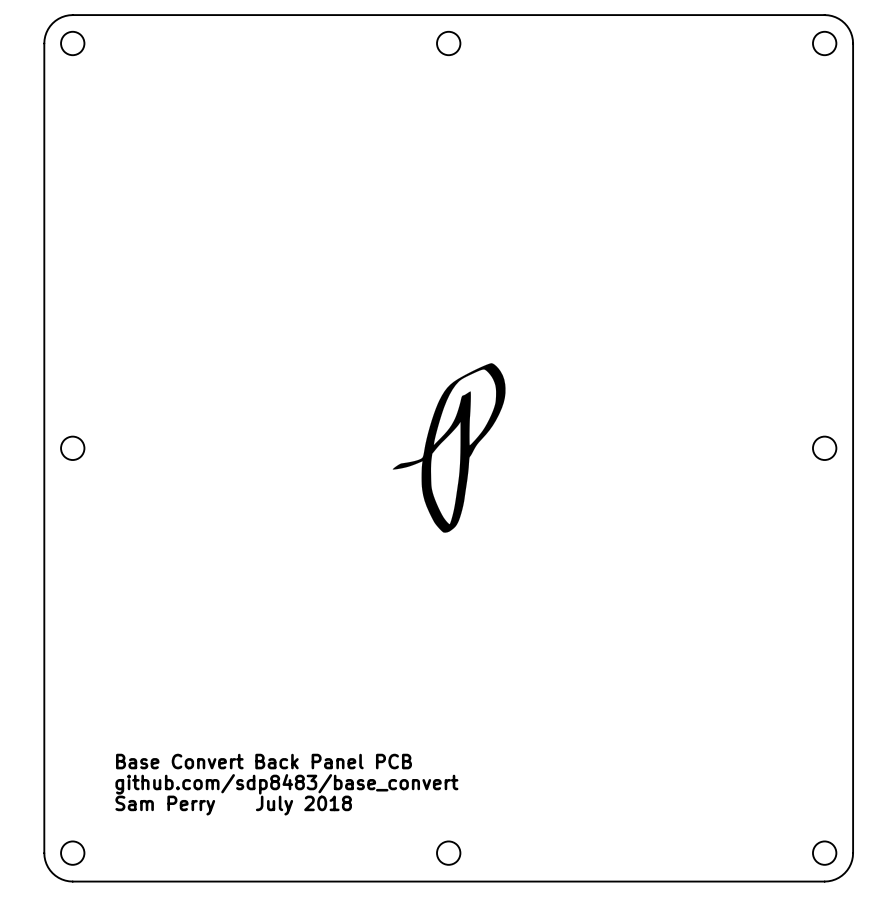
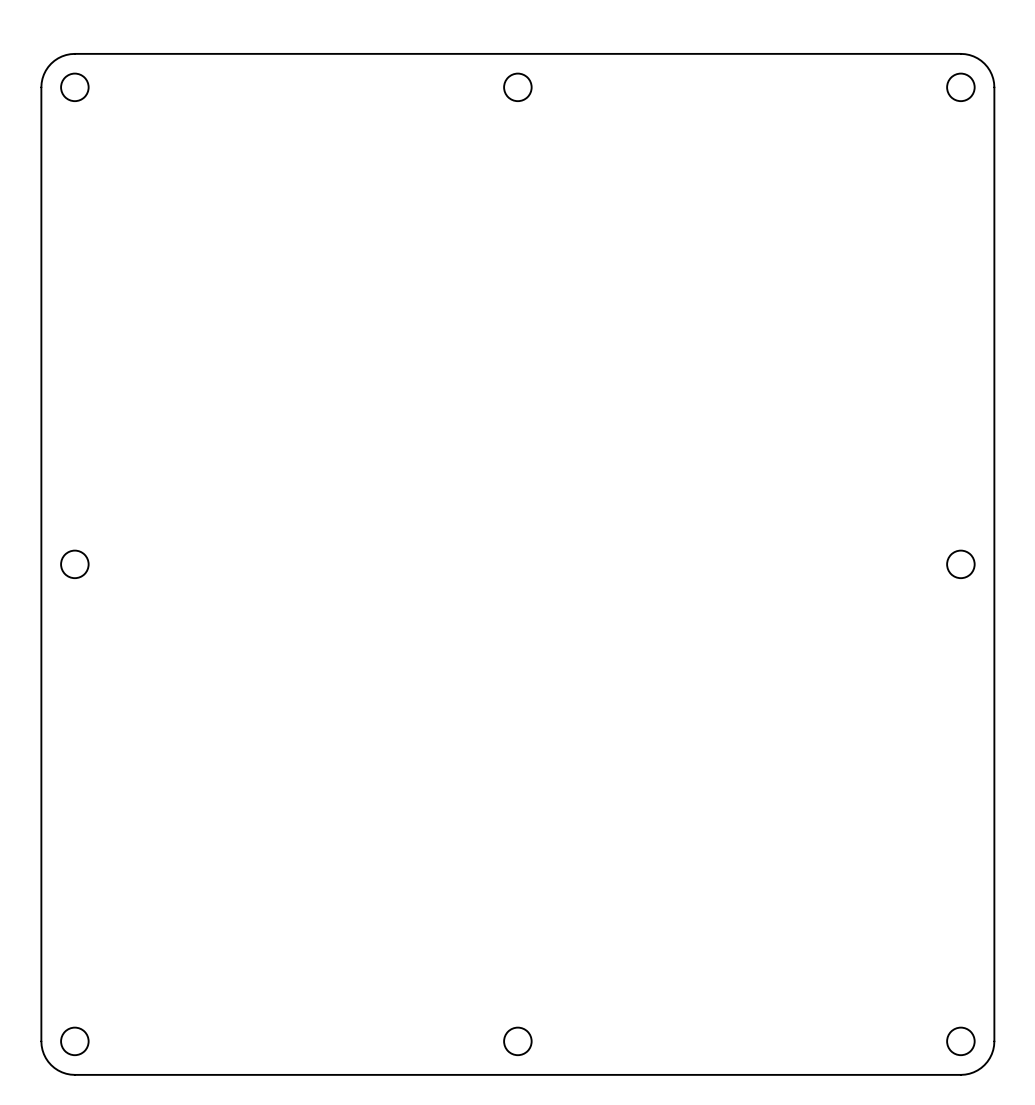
drawing: [392, 363, 506, 533] -> none
text: Base Convert Back Panel PCB (264, 761) -> none
text: github.com/sdp8483/base_convert (286, 784) -> none
text: Sam Perry July 2018 (233, 805) -> none

